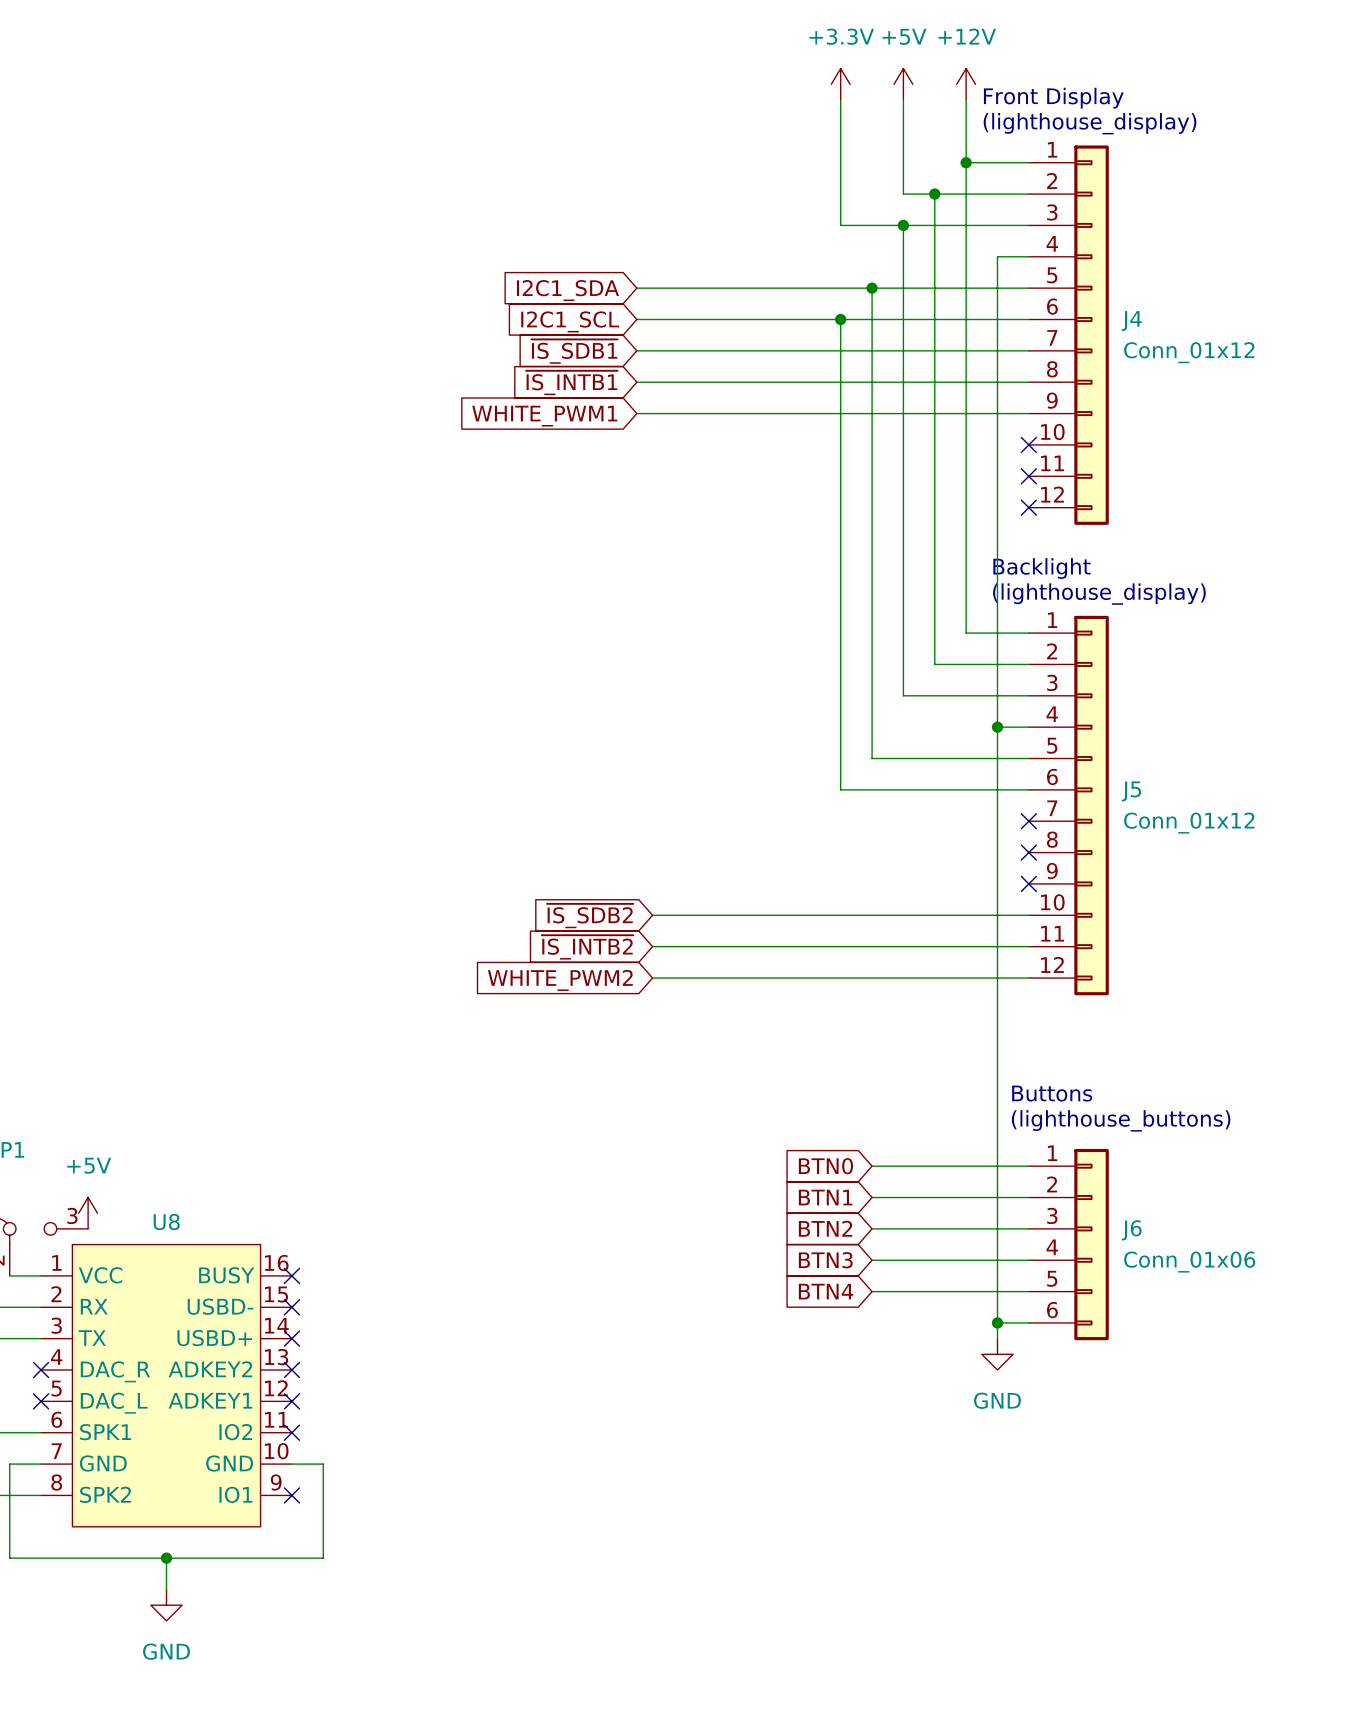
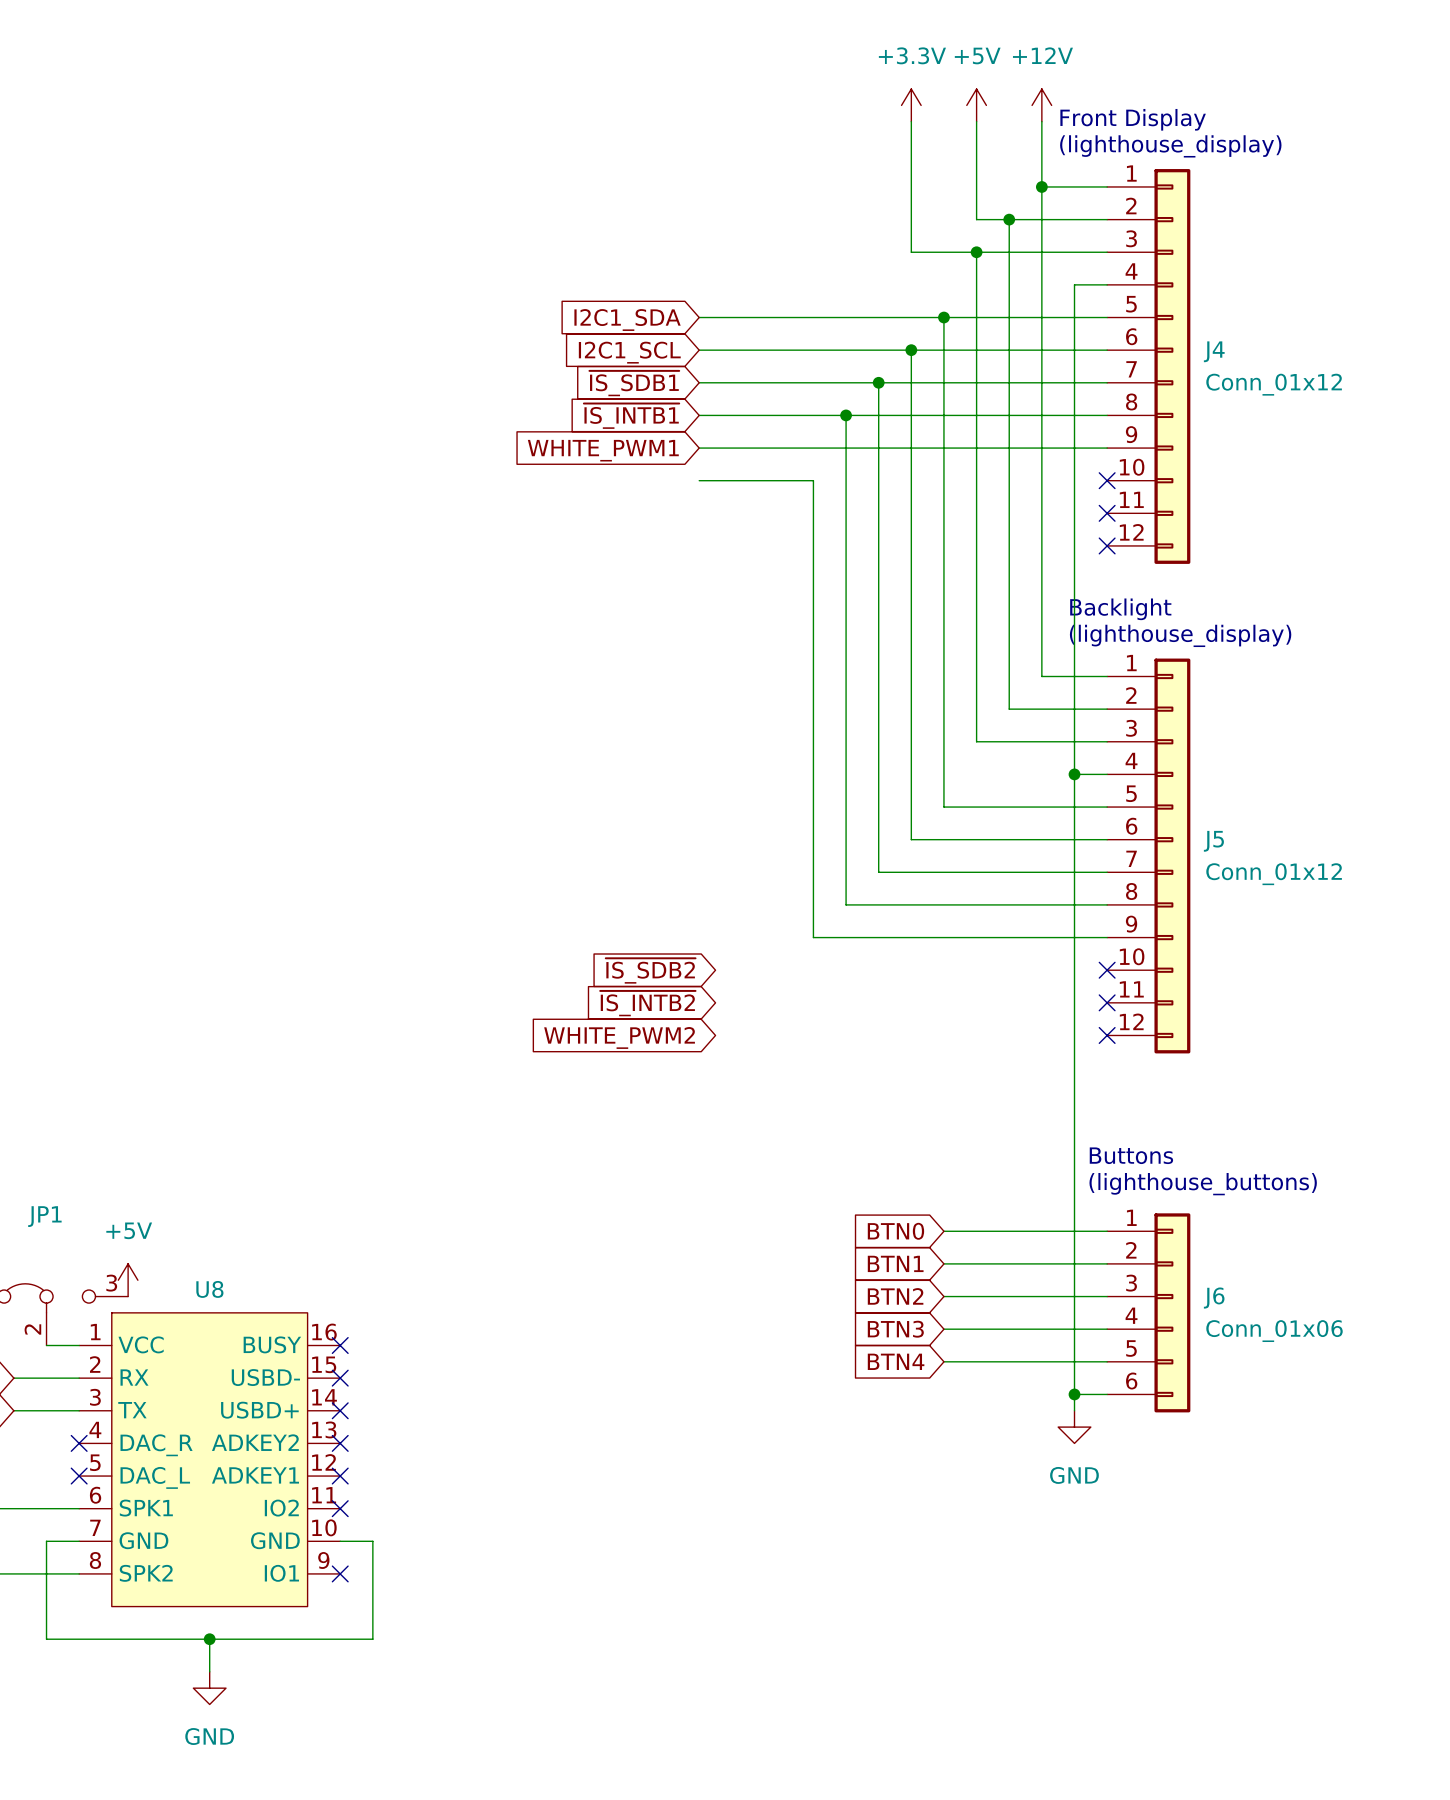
wire: none -> (878, 382) (878, 872) (1107, 872)
junction: none -> (878, 382)
wire: none -> (846, 415) (846, 904) (1107, 904)
junction: none -> (846, 415)
wire: none -> (699, 480) (813, 480) (813, 937) (1107, 937)
no-connect mark: (1028, 821) -> none
no-connect mark: (1028, 852) -> none
no-connect mark: (1028, 883) -> none
wire: (652, 915) (1028, 915) -> none
no-connect mark: none -> (1107, 970)
wire: (652, 946) (1028, 946) -> none
no-connect mark: none -> (1107, 1002)
wire: (652, 978) (1028, 978) -> none
no-connect mark: none -> (1107, 1035)

